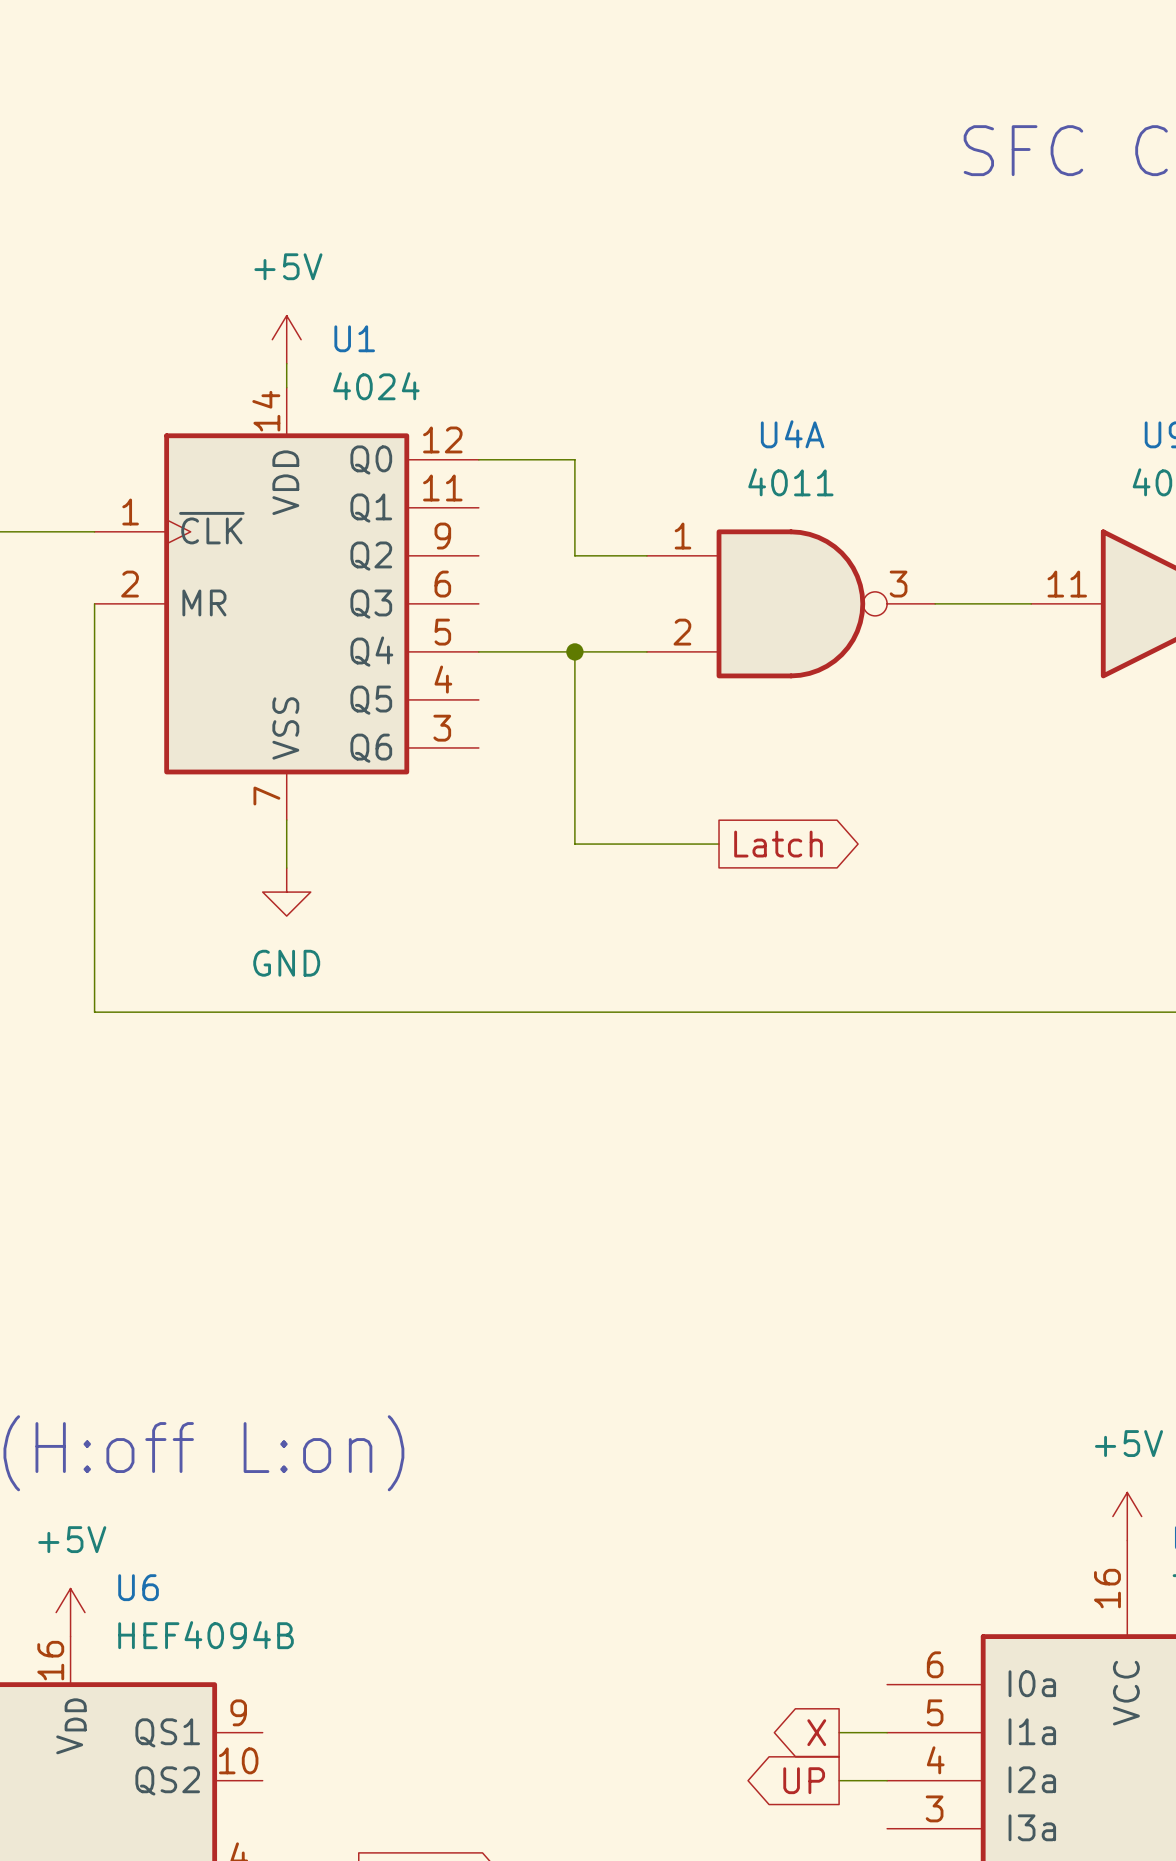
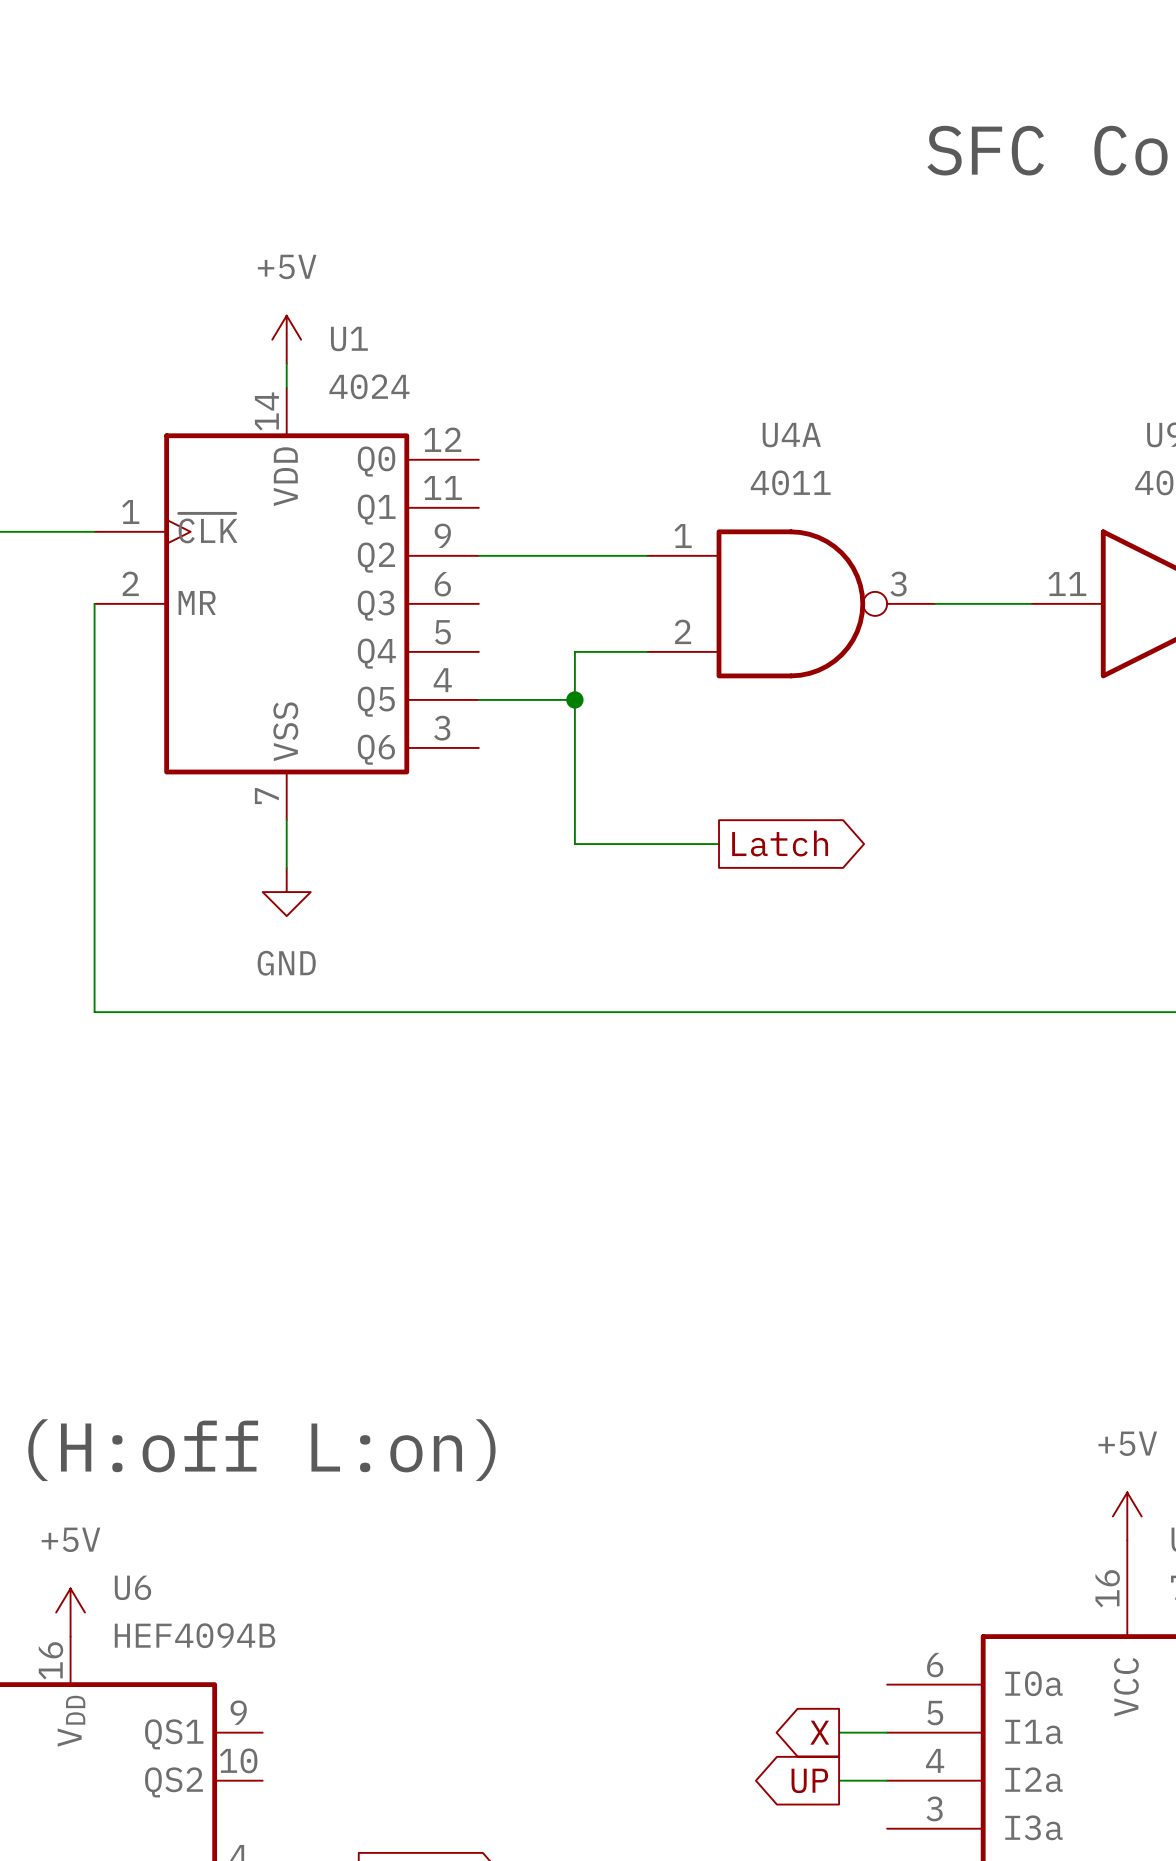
wire: (478, 459) (574, 459) (574, 555) -> (478, 555) (574, 555)
wire: (478, 651) (574, 651) -> (478, 699) (574, 699)
junction position: (574, 651) -> (574, 699)

